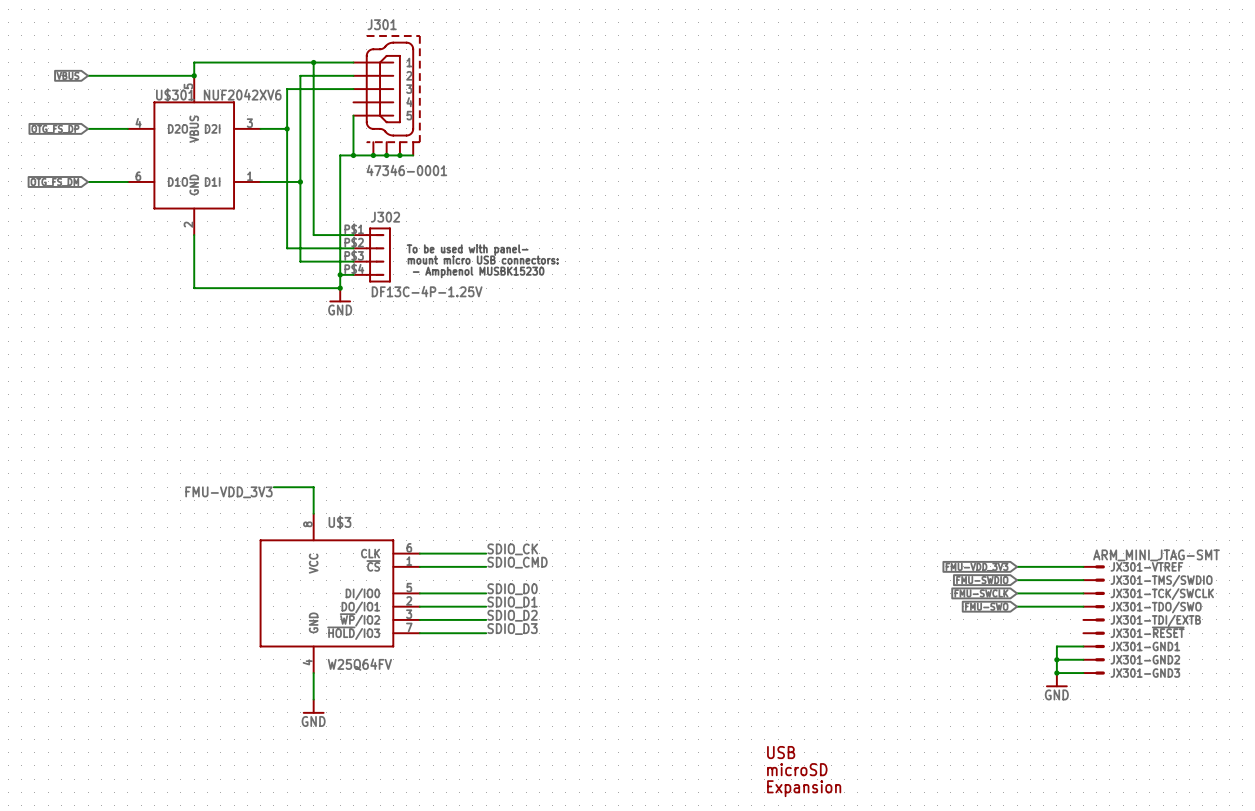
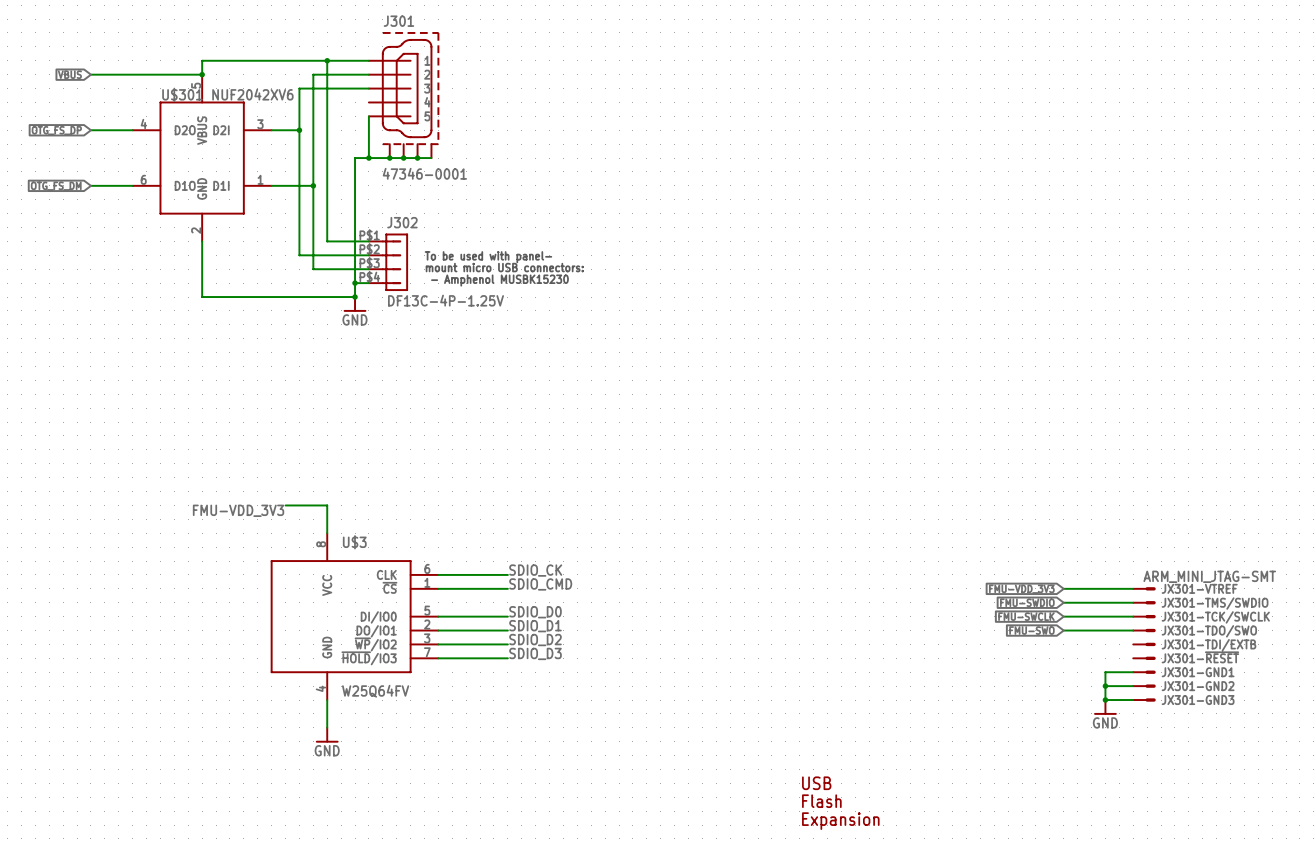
text: microSD (797, 769) -> Flash (821, 801)

